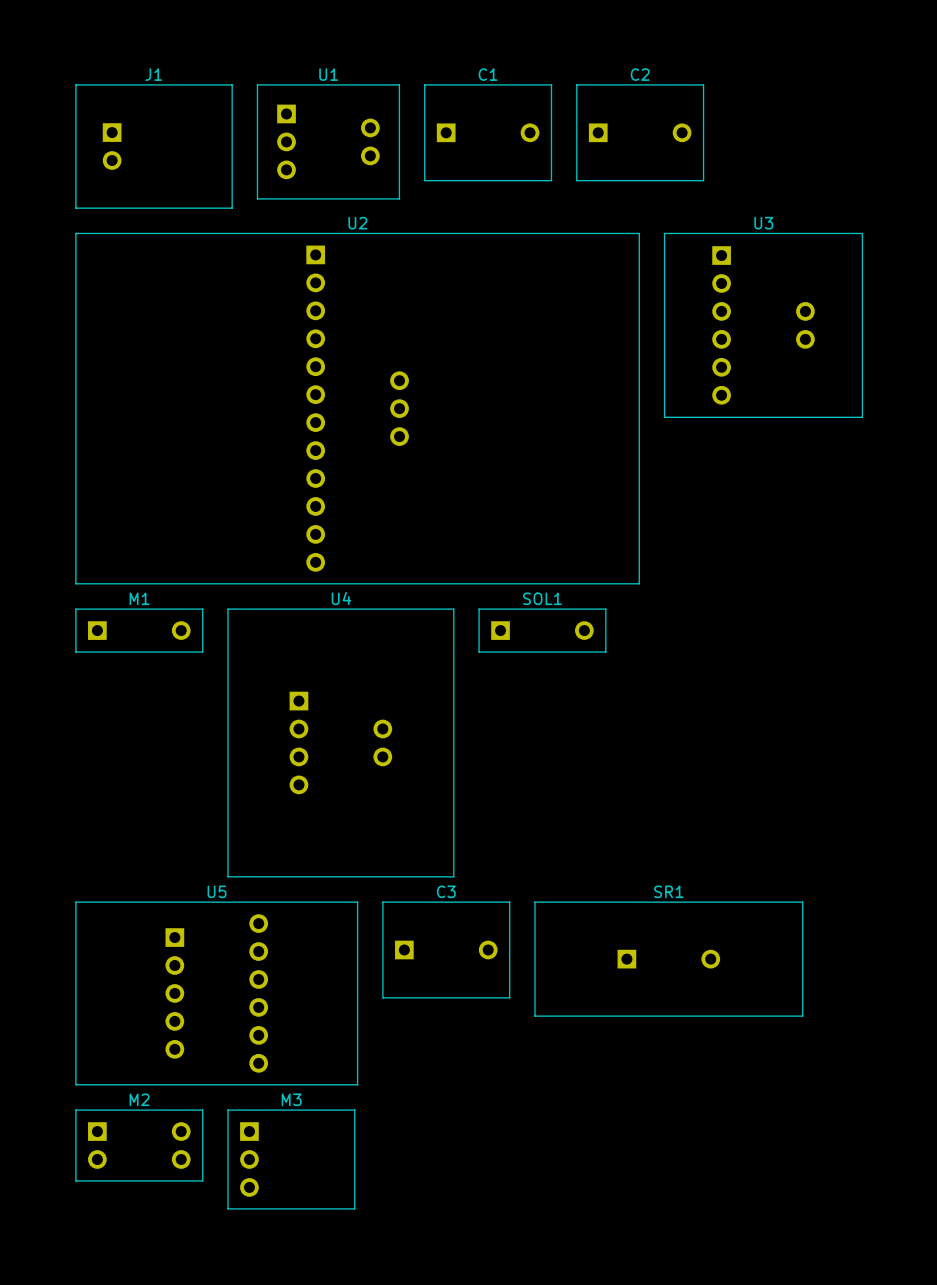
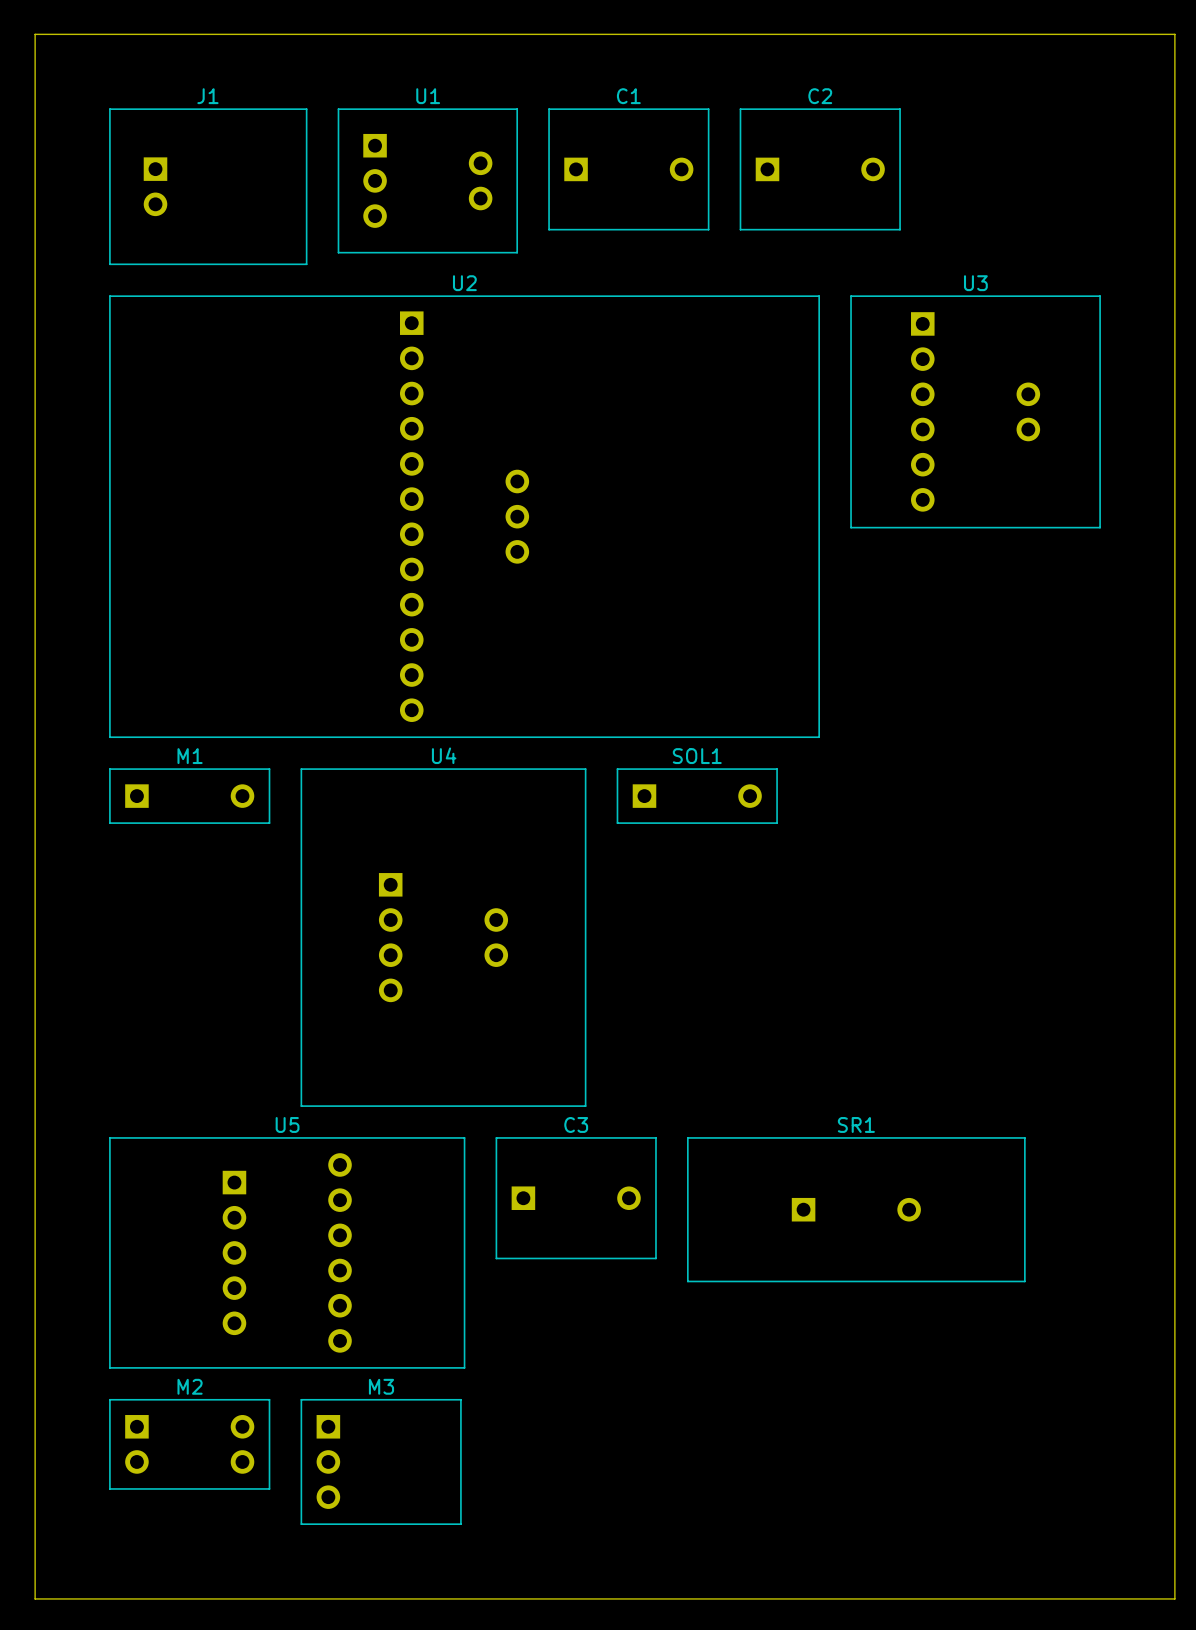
board edge: none -> (35, 34) (1174, 34) (1174, 1598) (35, 1598) (35, 34)

